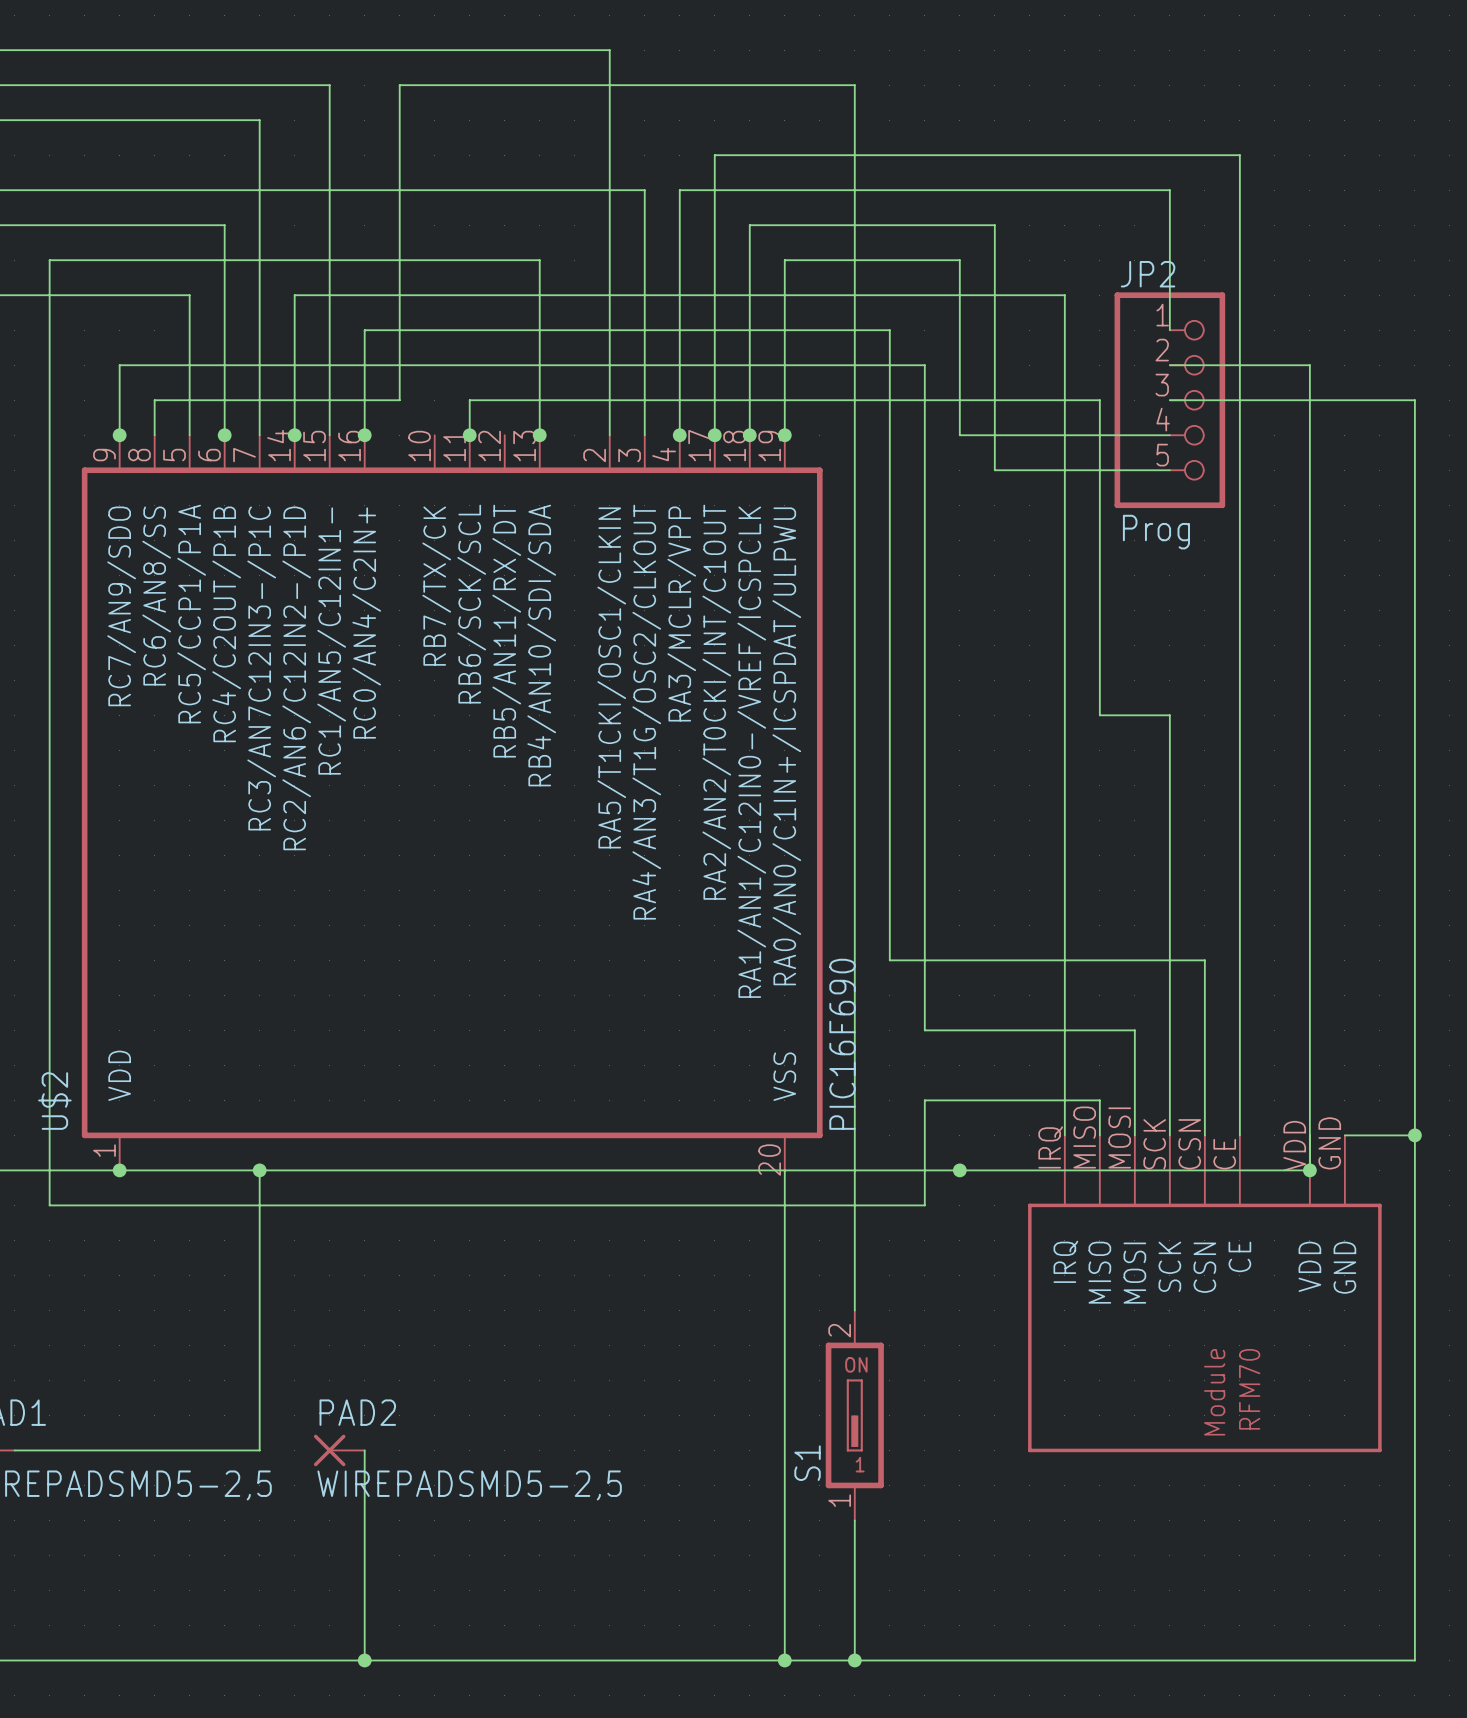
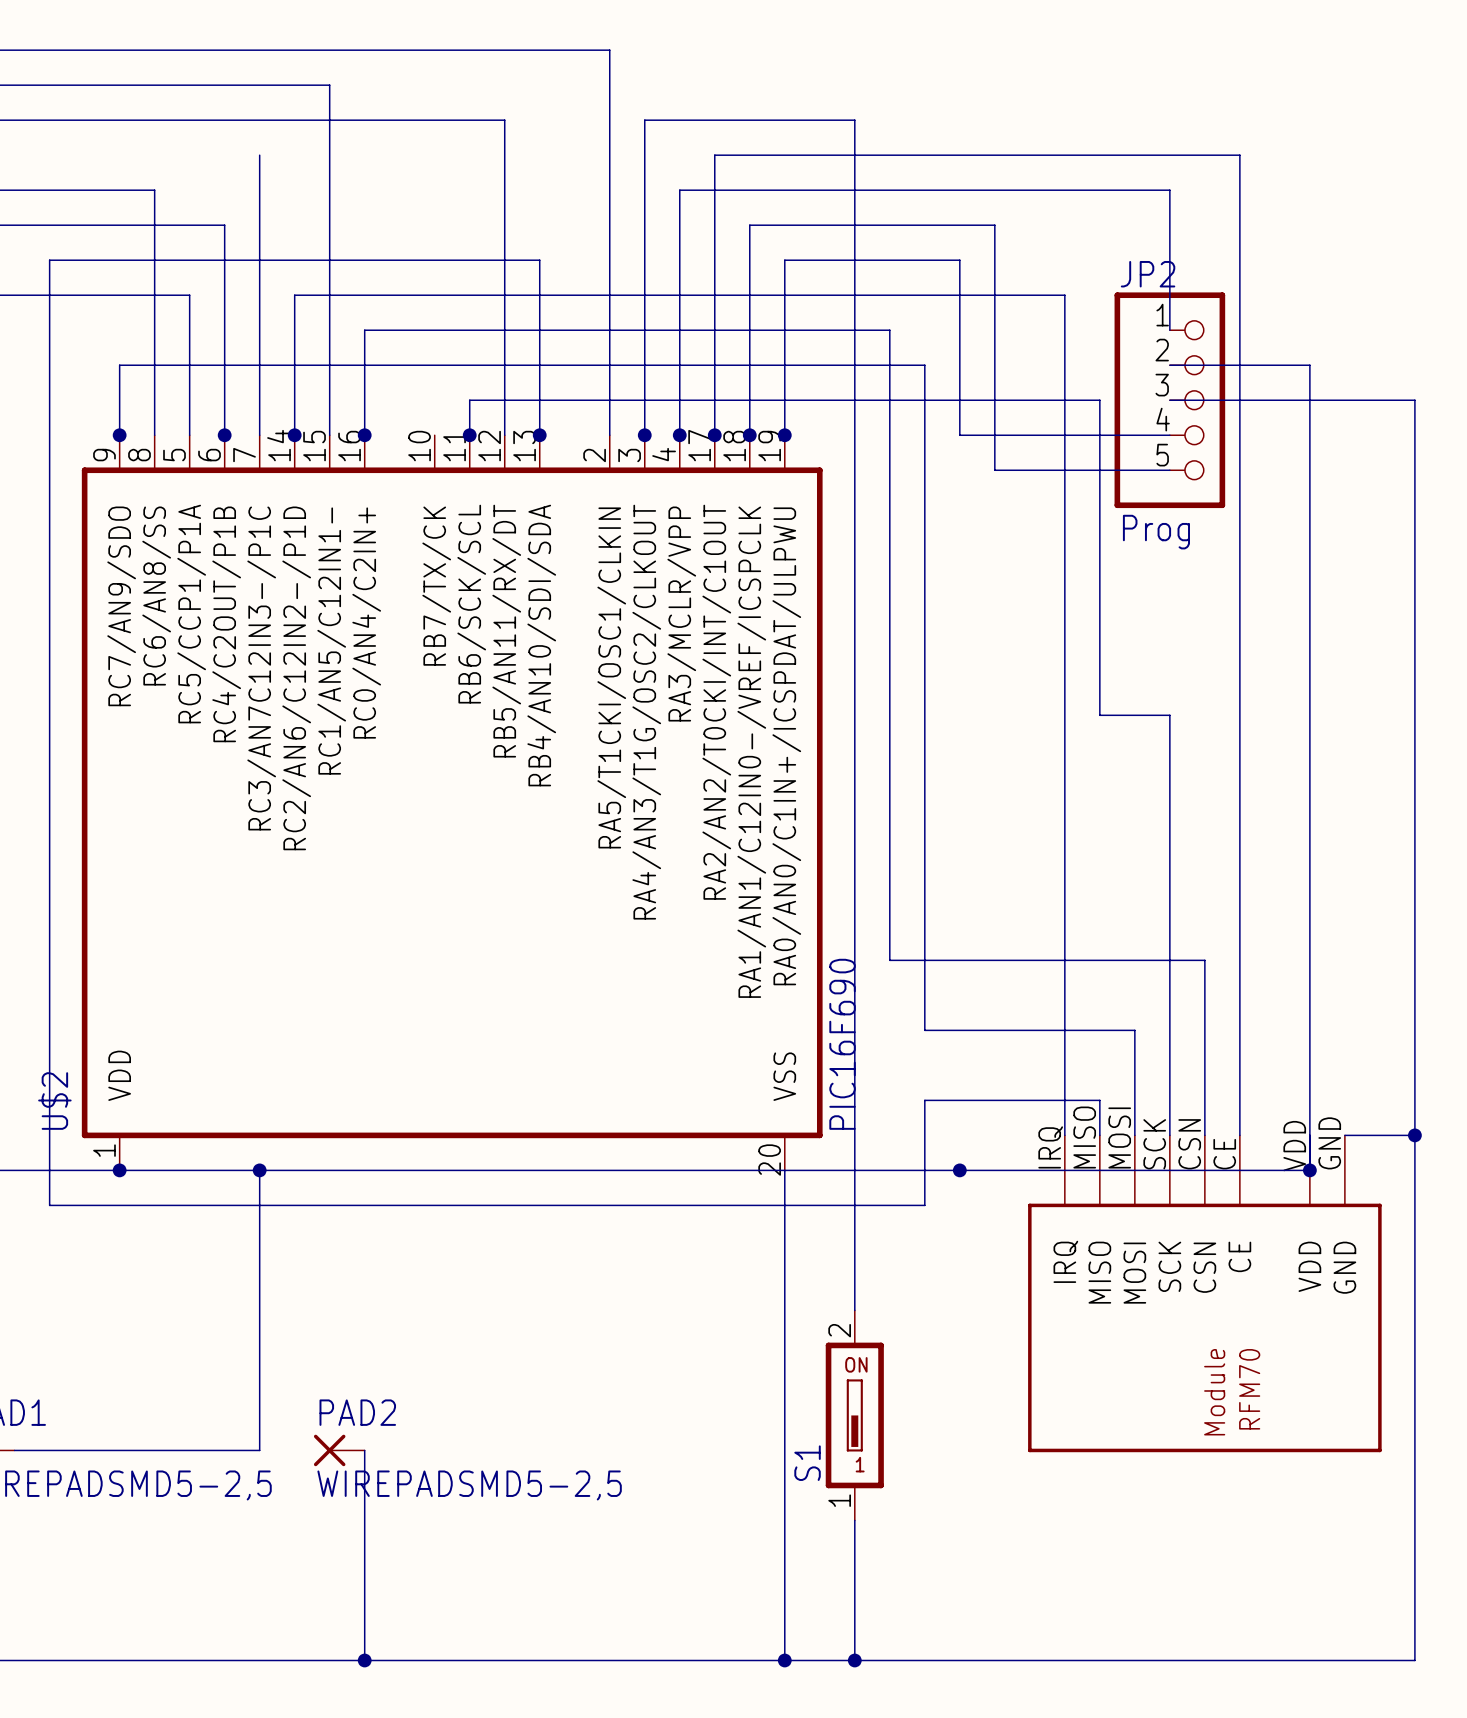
wire: (259, 120) (259, 155) -> (259, 120) (504, 120) (504, 435)
wire: (854, 120) (854, 85) (399, 85) (399, 400) (154, 400) -> (854, 120) (644, 120) (644, 190)
wire: (154, 190) (644, 190) -> (154, 190) (154, 400)
junction: none -> (644, 435)

